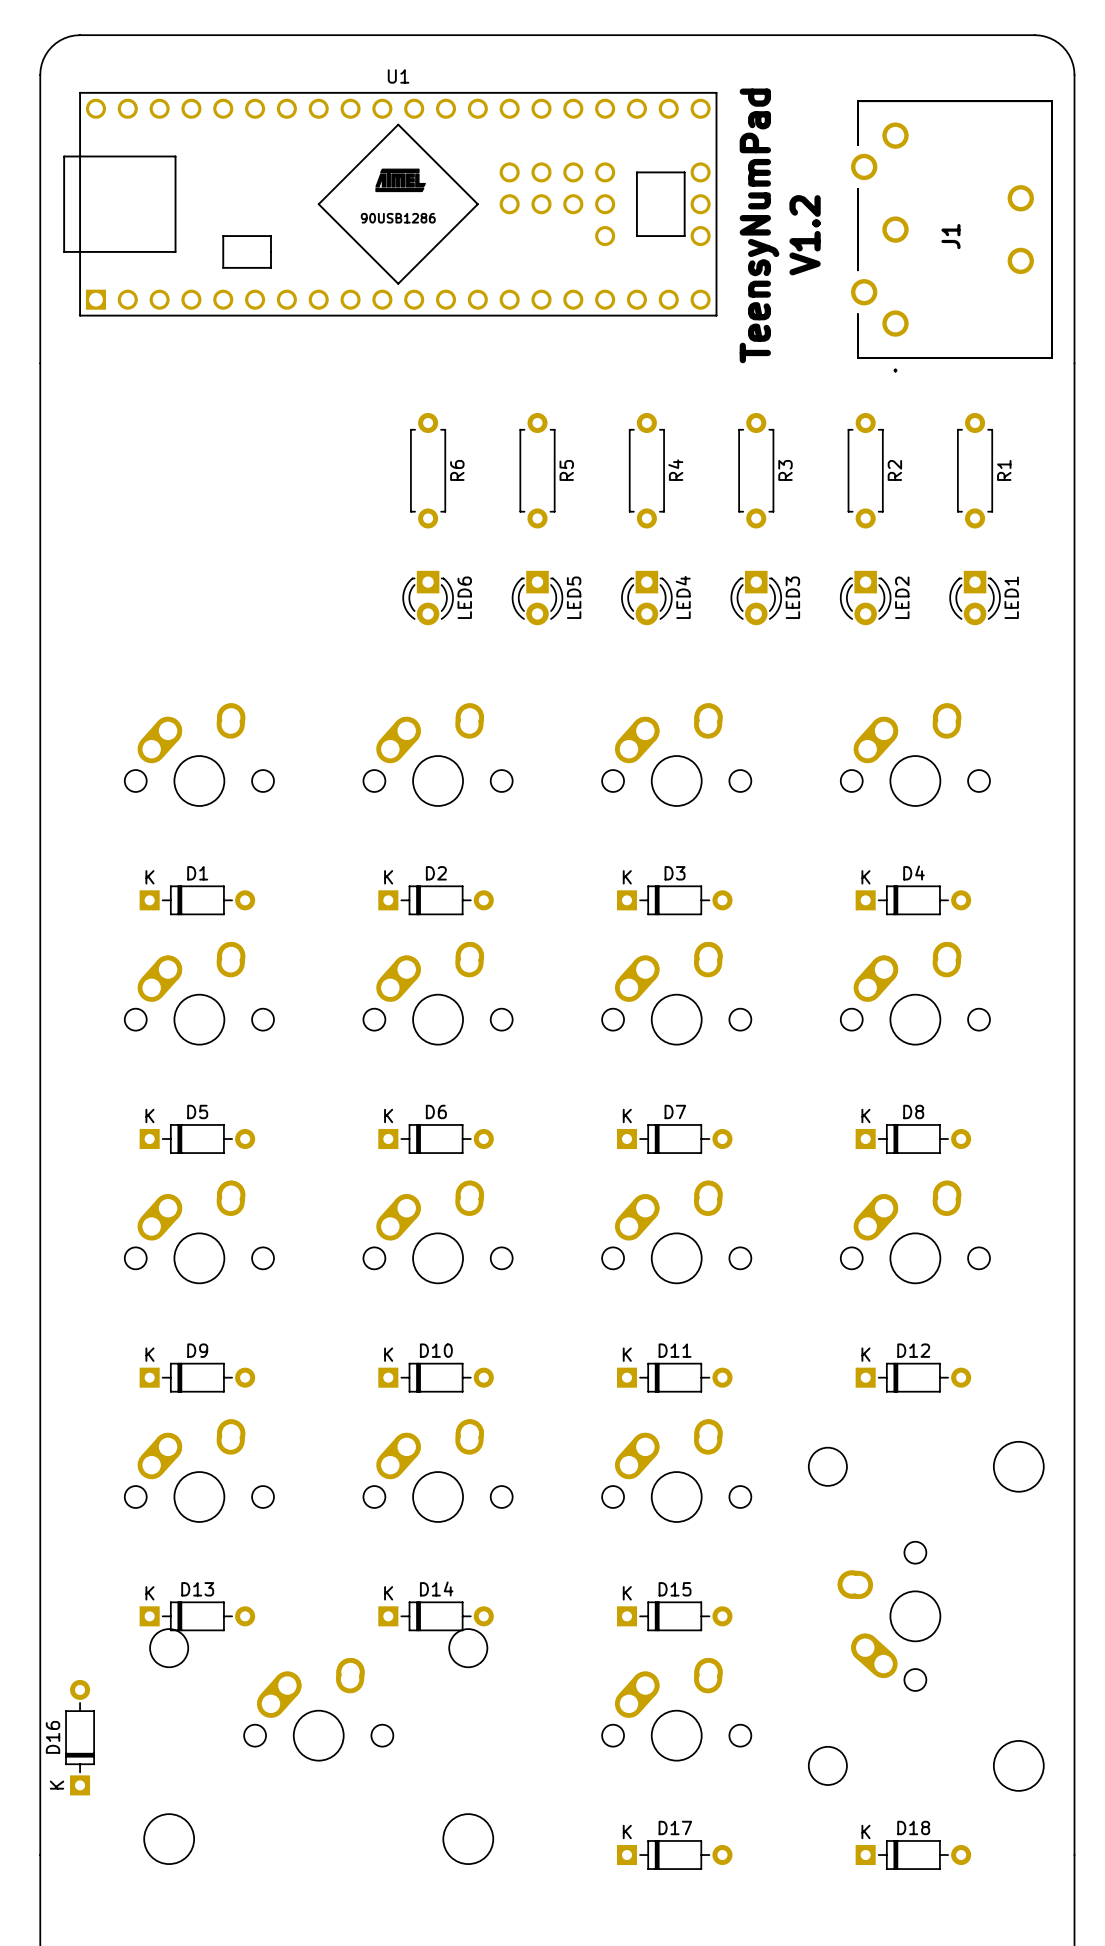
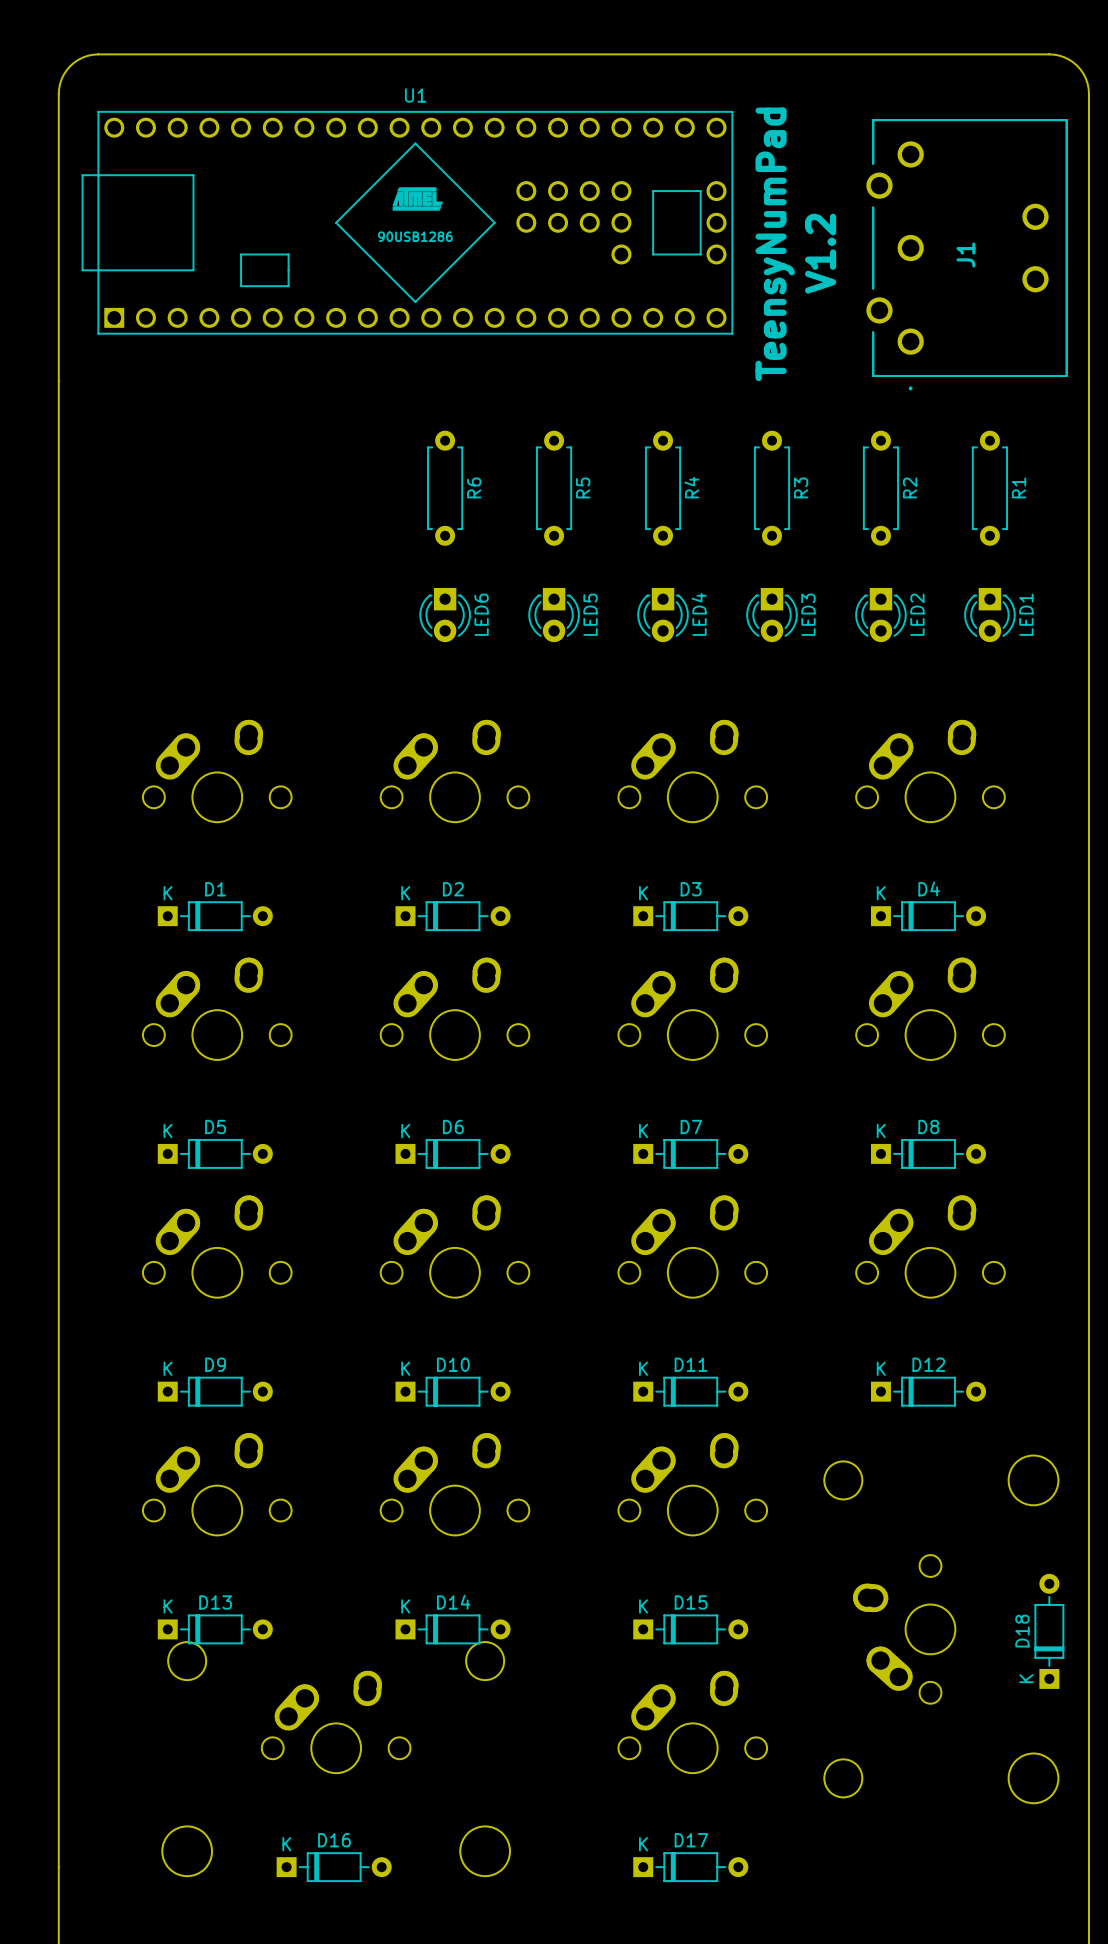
D16 rotation: 0° (80, 1737) -> 90° clockwise (334, 1867)
D16 position: (80, 1737) -> (334, 1867)
D18 rotation: 0° (913, 1855) -> 90° counterclockwise (1049, 1631)
D18 position: (913, 1855) -> (1049, 1631)

